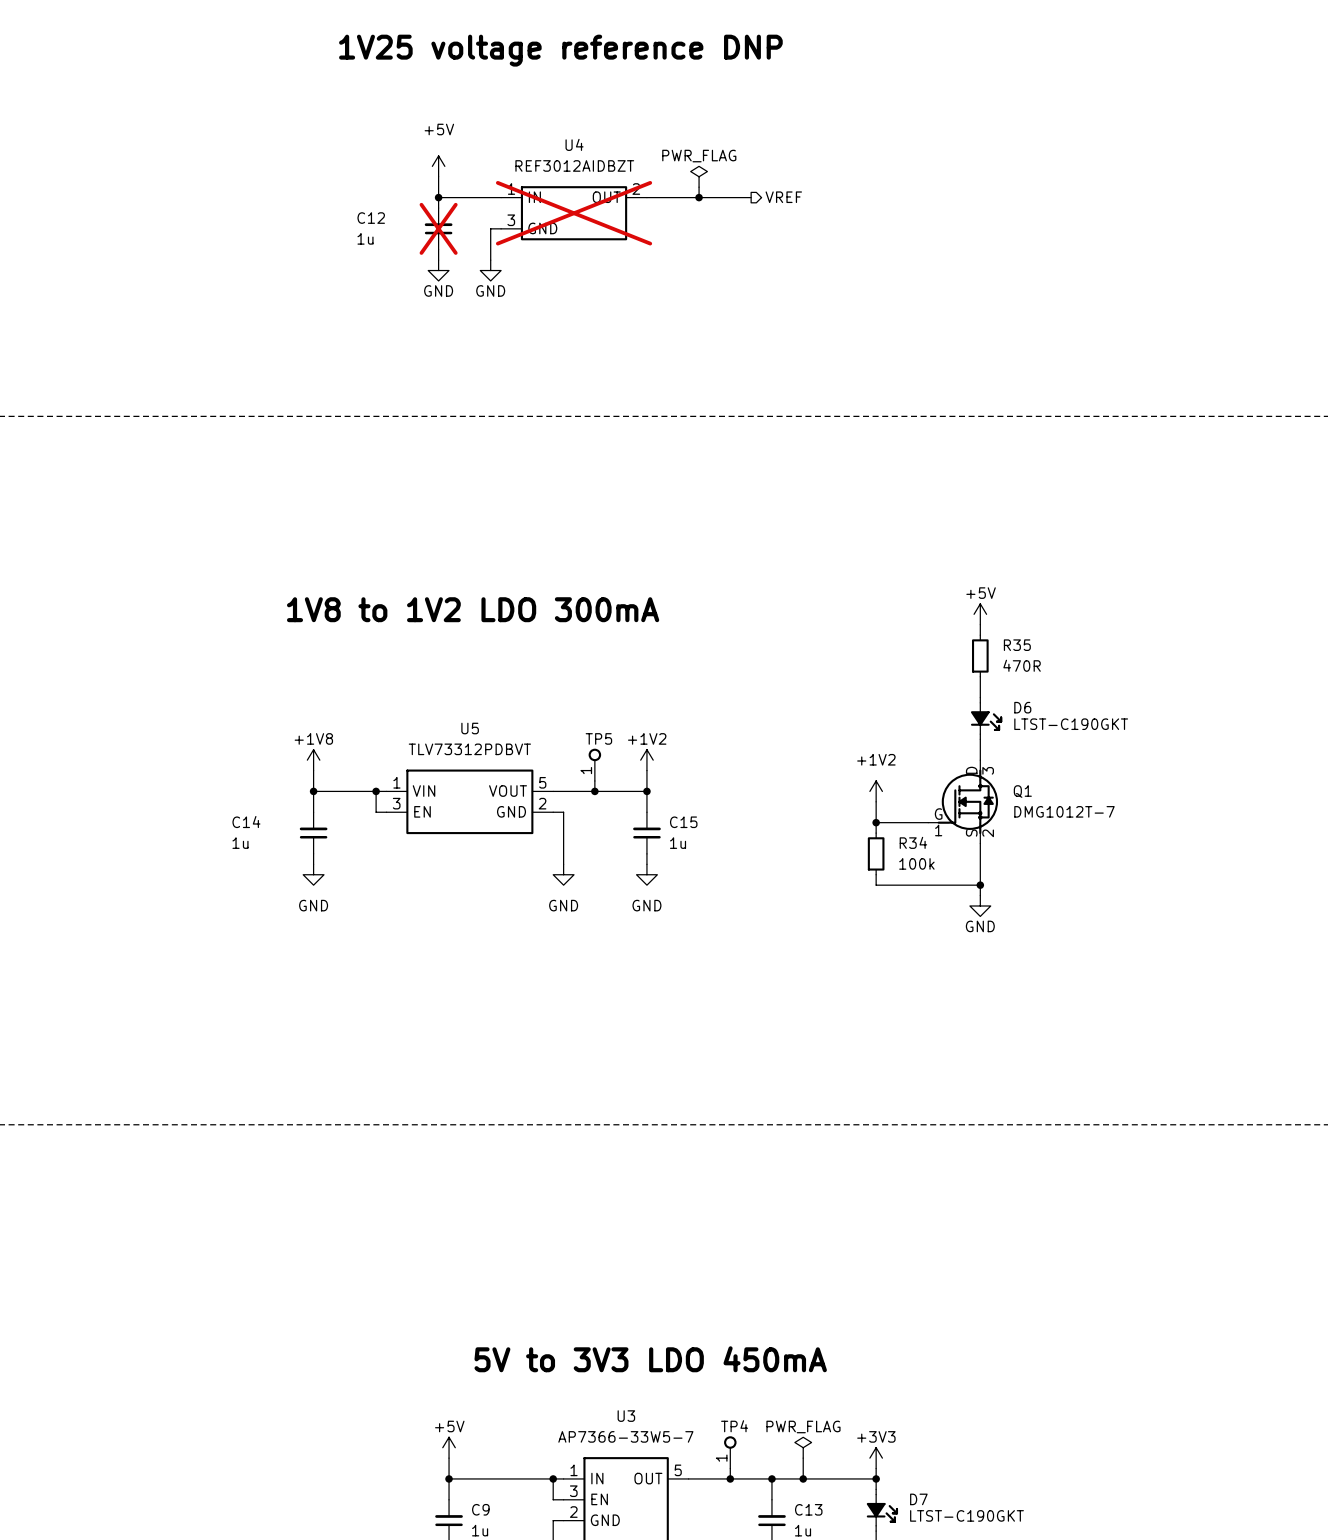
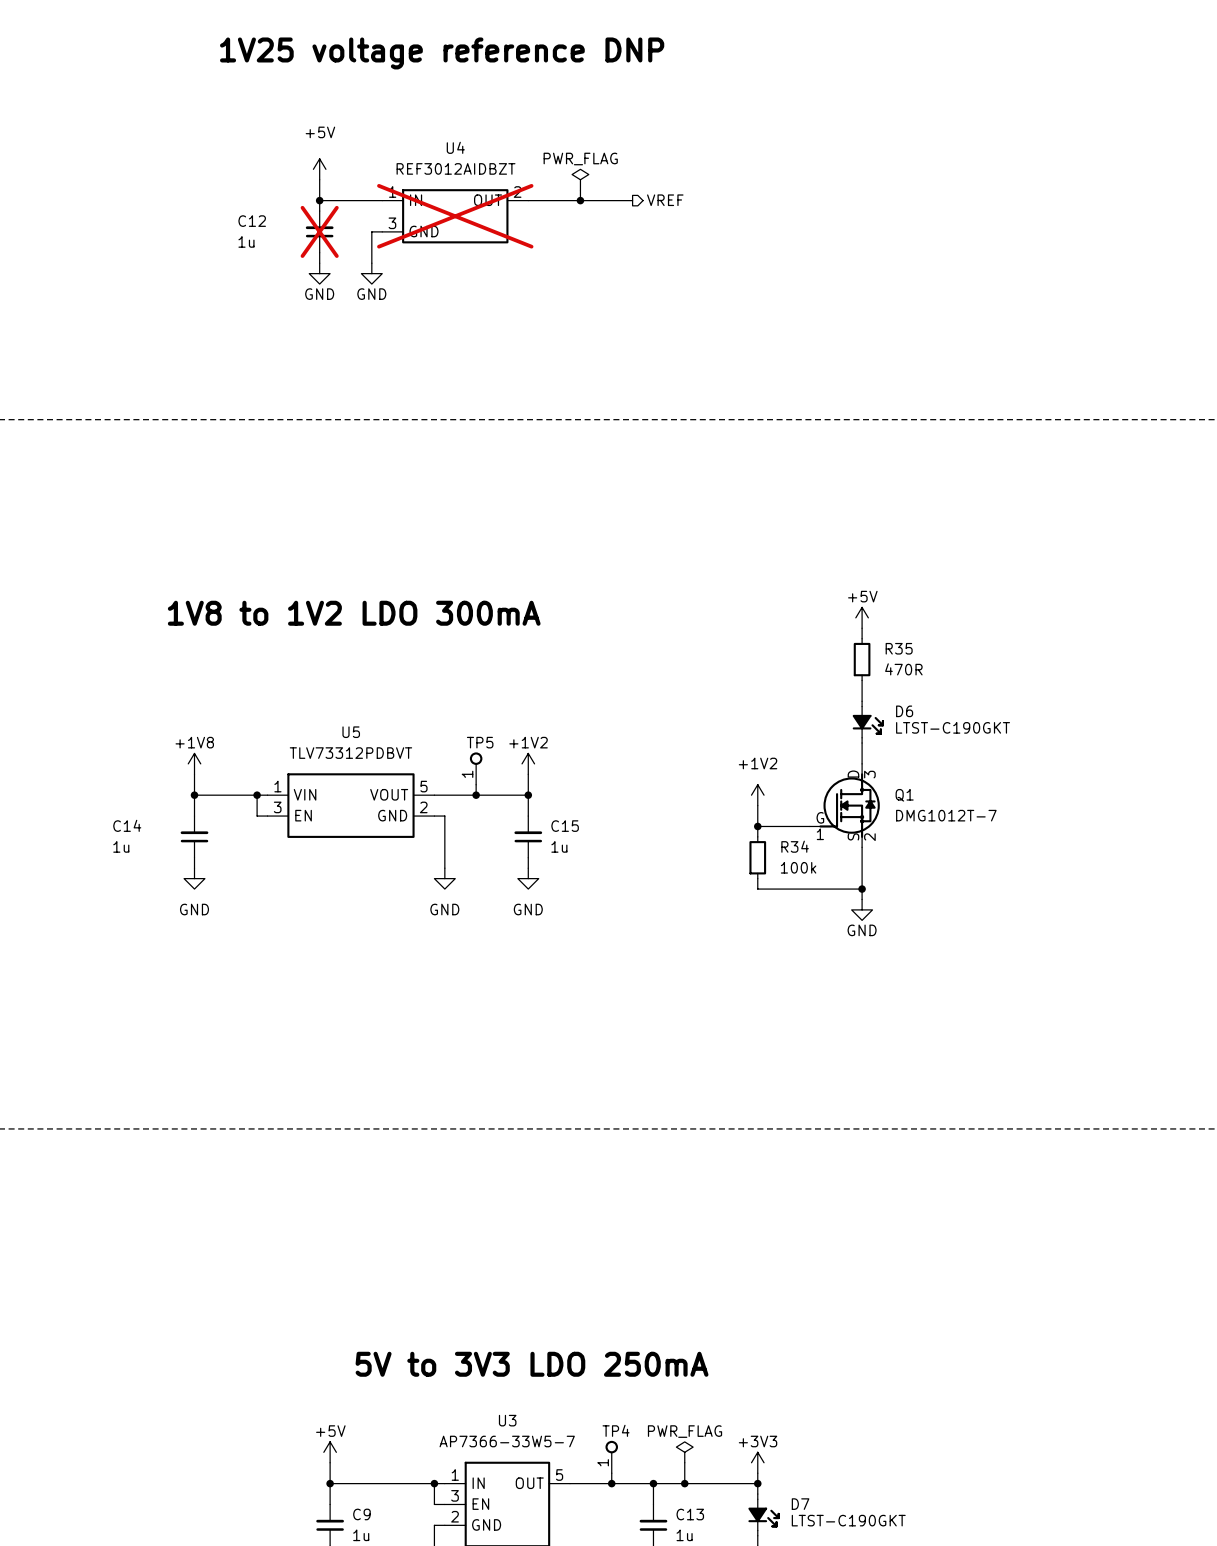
text: 5V to 3V3 LDO 450mA (650, 1359) -> 5V to 3V3 LDO 250mA (532, 1364)

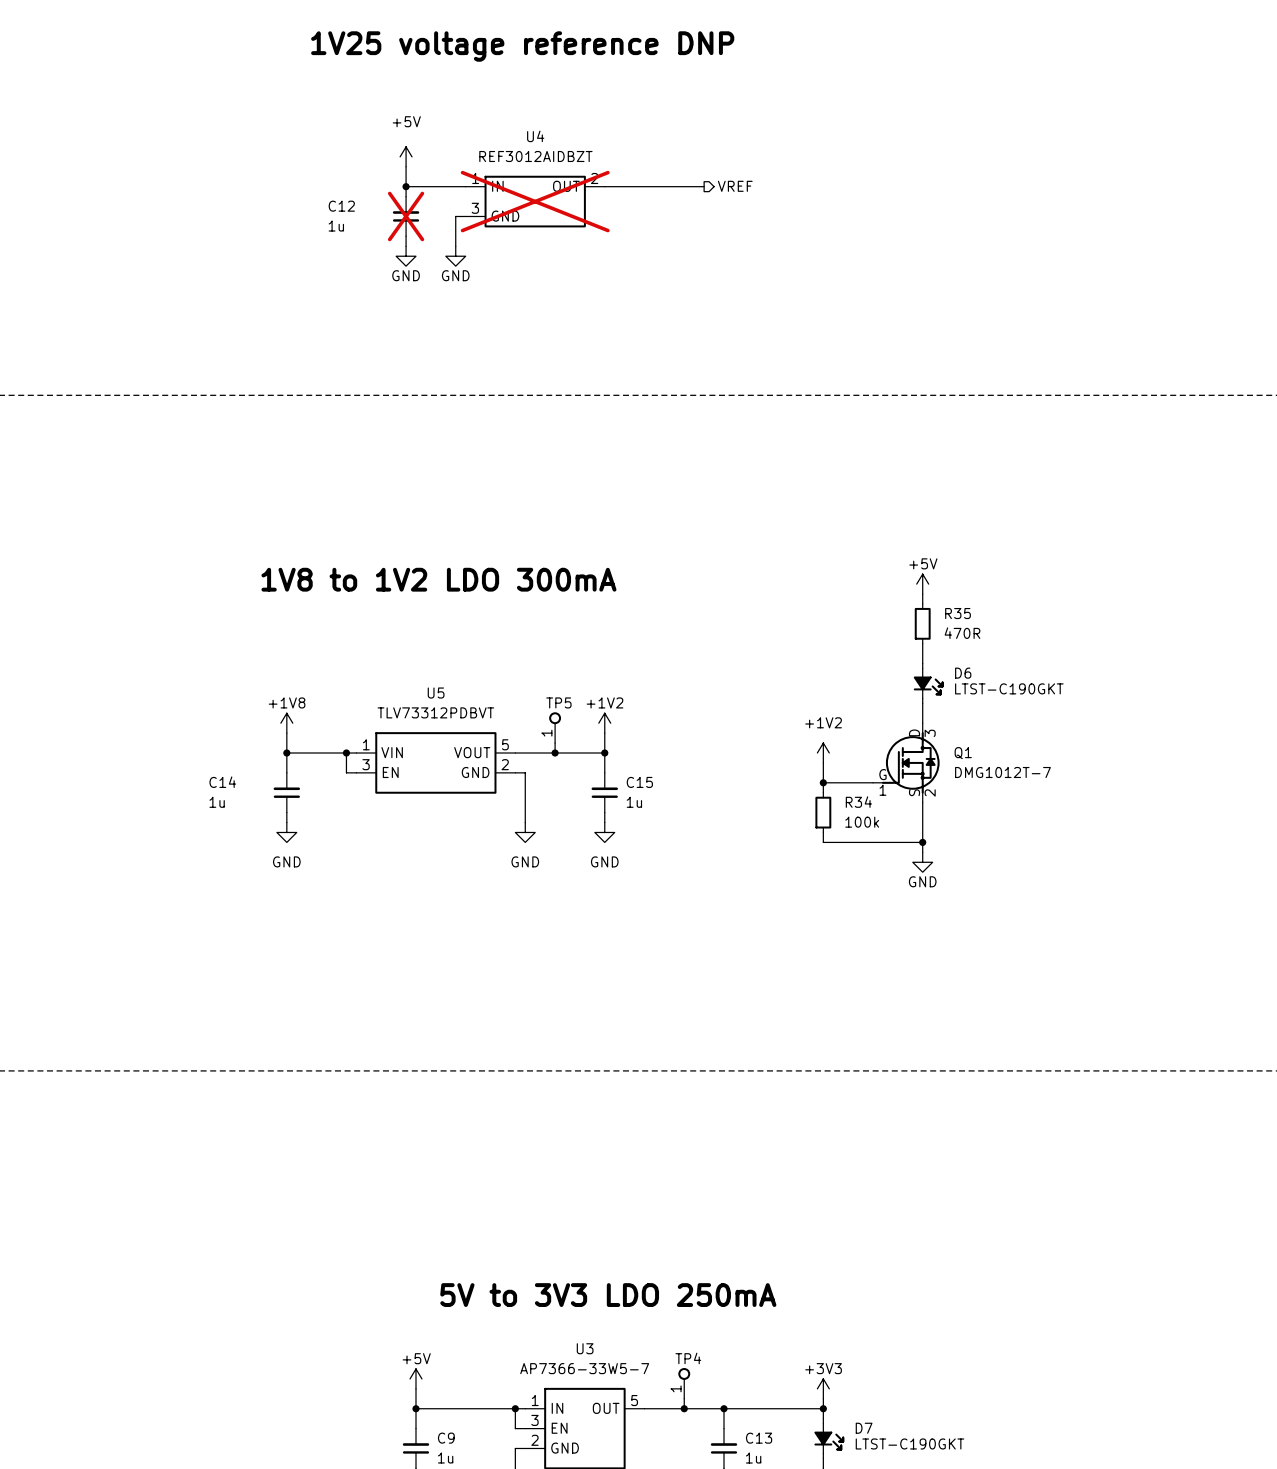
power symbol: PWR_FLAG (580, 179) -> none
wire: (580, 190) (580, 200) -> none
junction: (580, 200) -> none
power symbol: PWR_FLAG (684, 1452) -> none
wire: (684, 1462) (684, 1483) -> none
junction: (684, 1483) -> none

